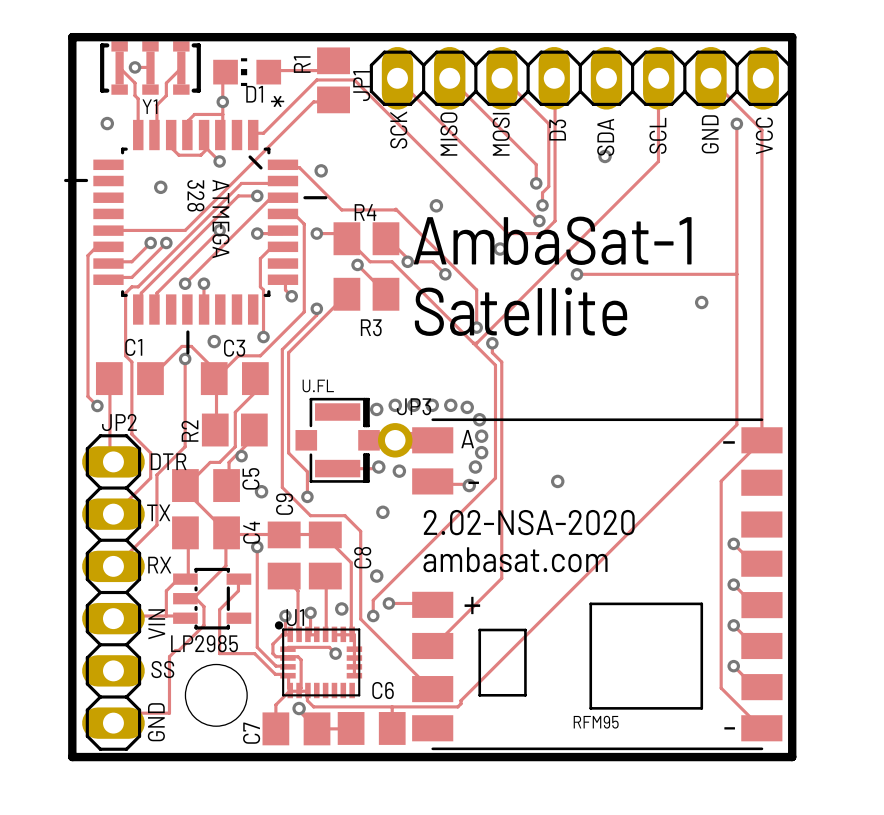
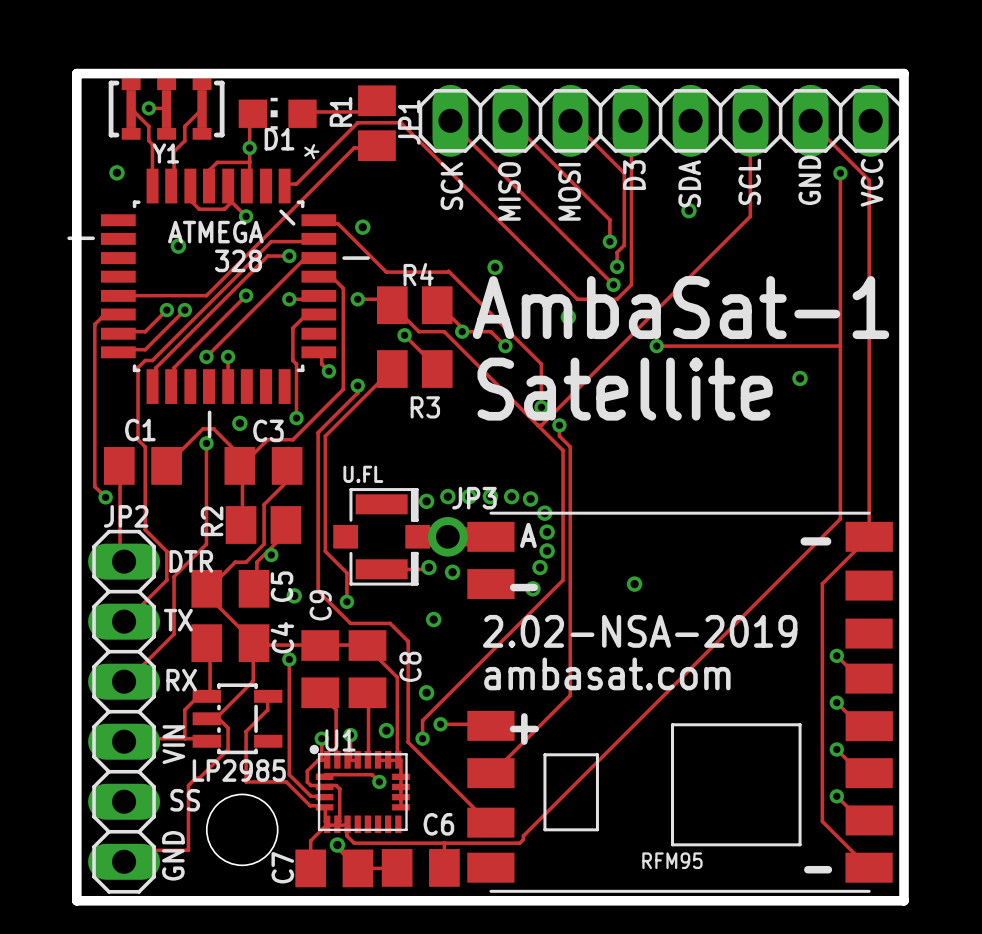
text rotation: 0° (195, 195) -> 90° counterclockwise (238, 260)
text rotation: 0° (220, 219) -> 90° counterclockwise (215, 232)
text: 2.02-NSA-2020 (529, 522) -> 2.02-NSA-2019 (640, 631)

